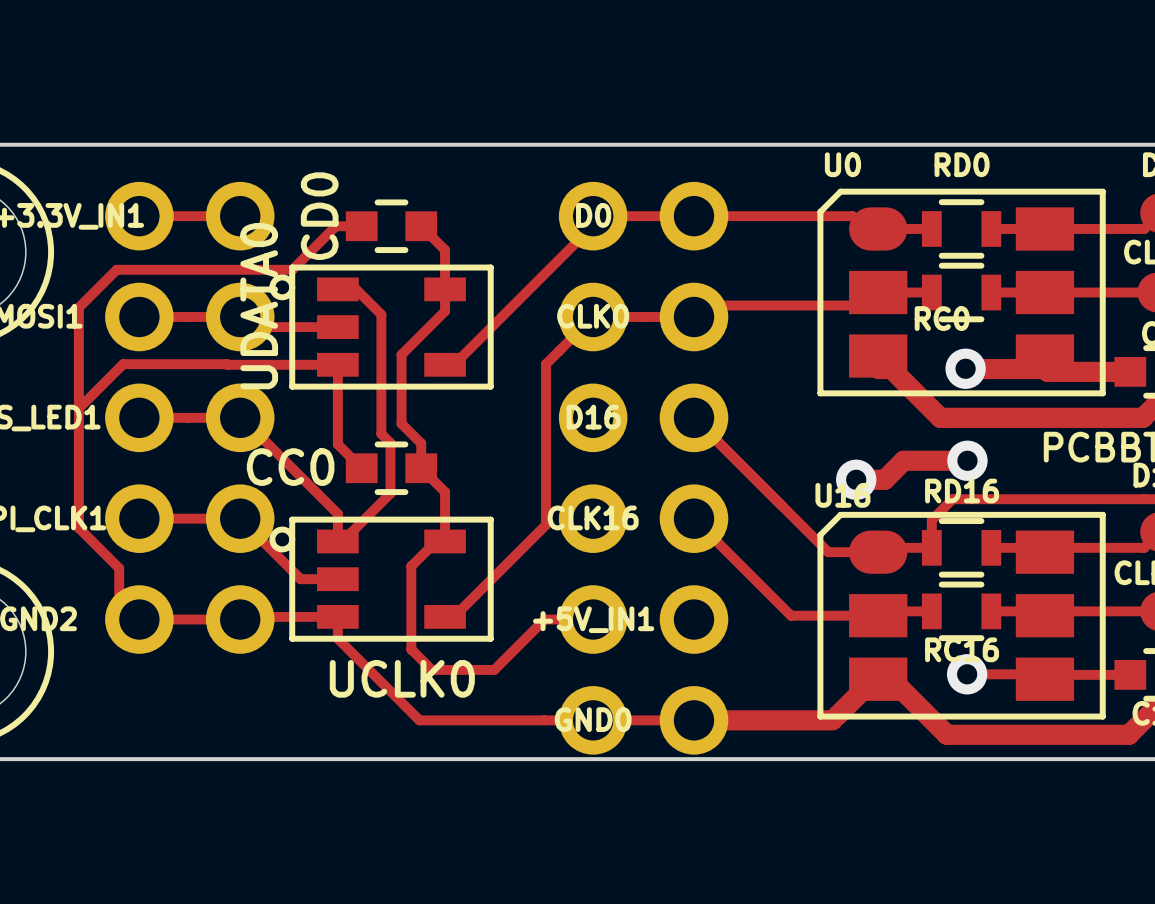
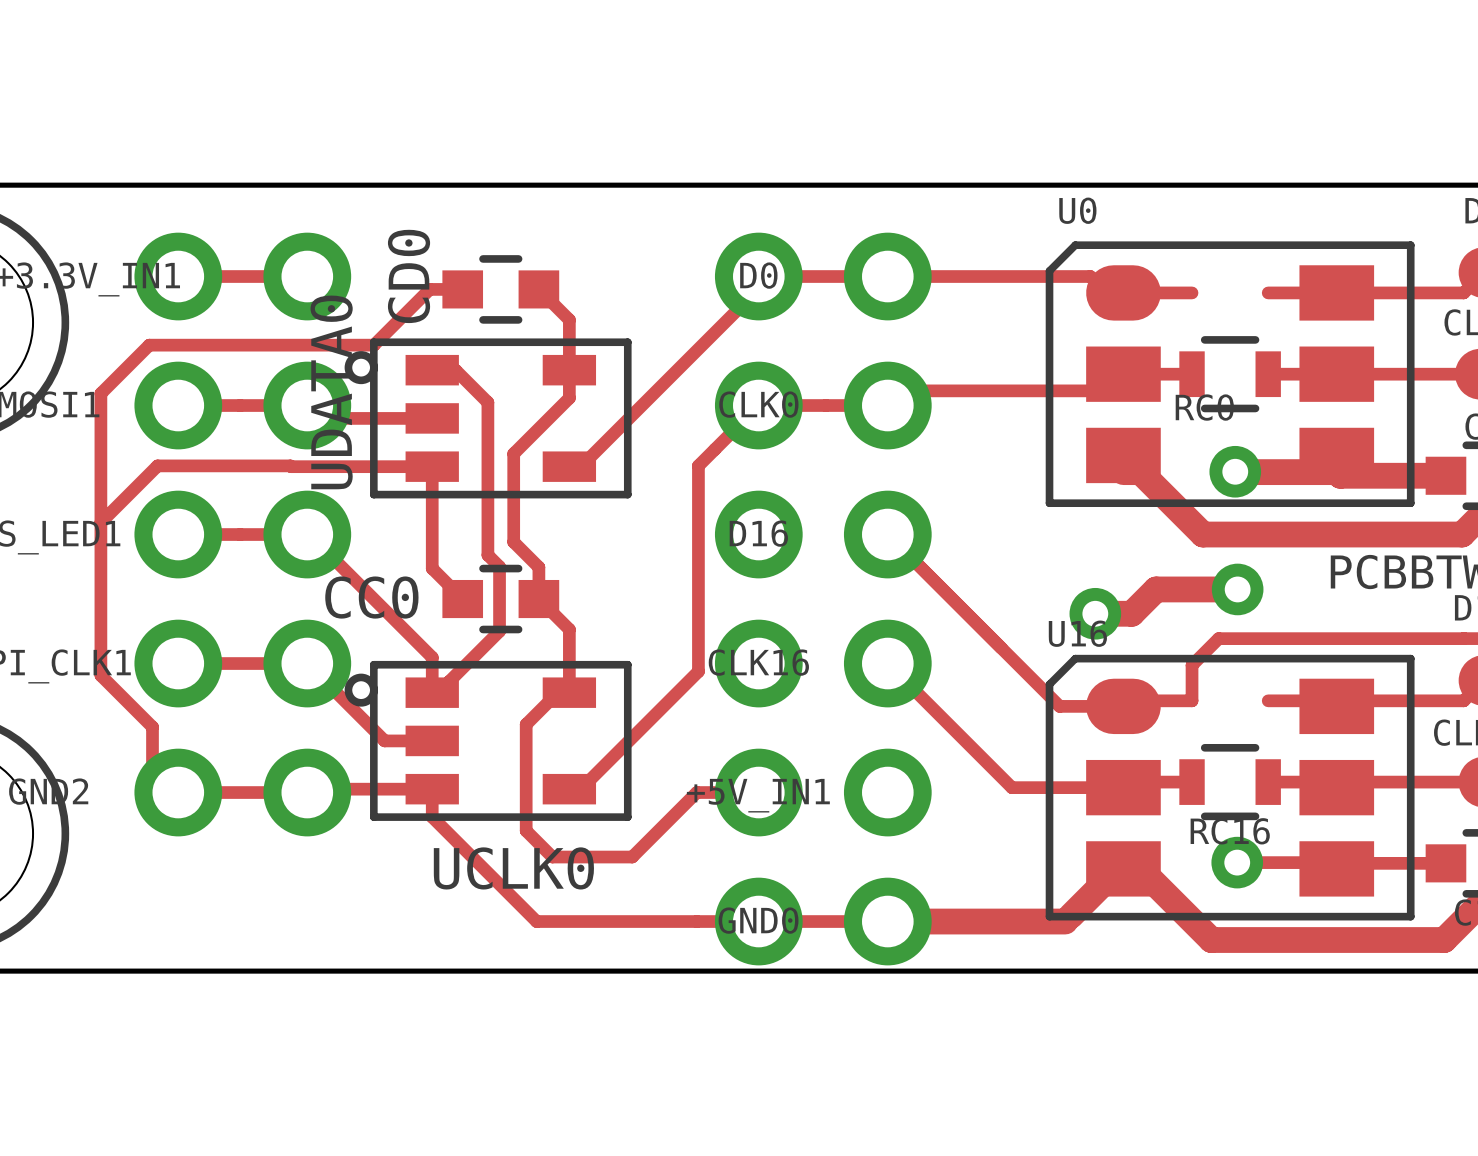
RD0: (961, 228) -> none
RD16: (961, 547) -> none

